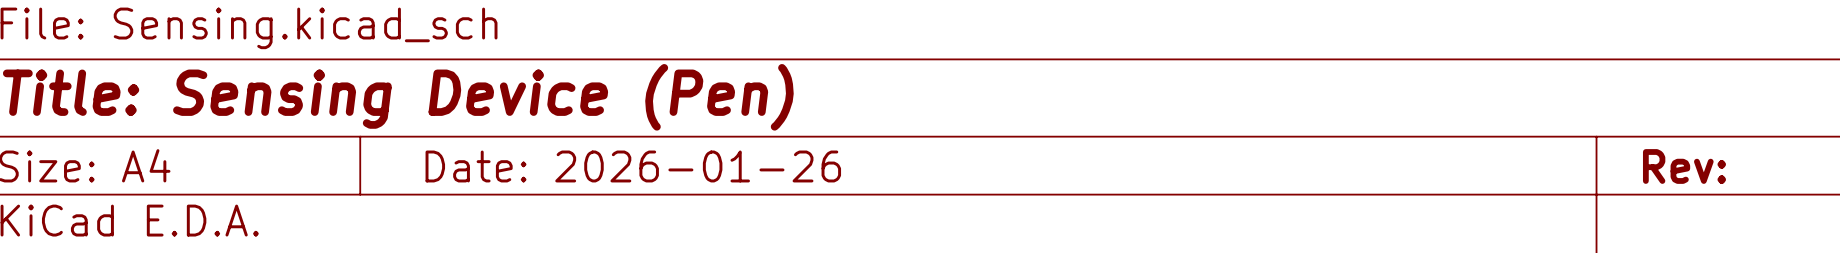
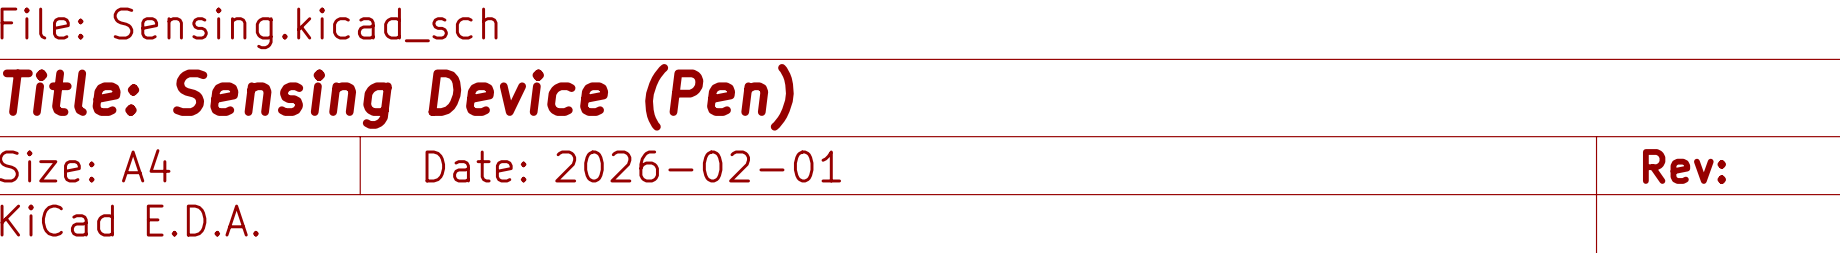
title block: Date: 2026-01-26 (633, 166) -> Date: 2026-02-01 (633, 166)

